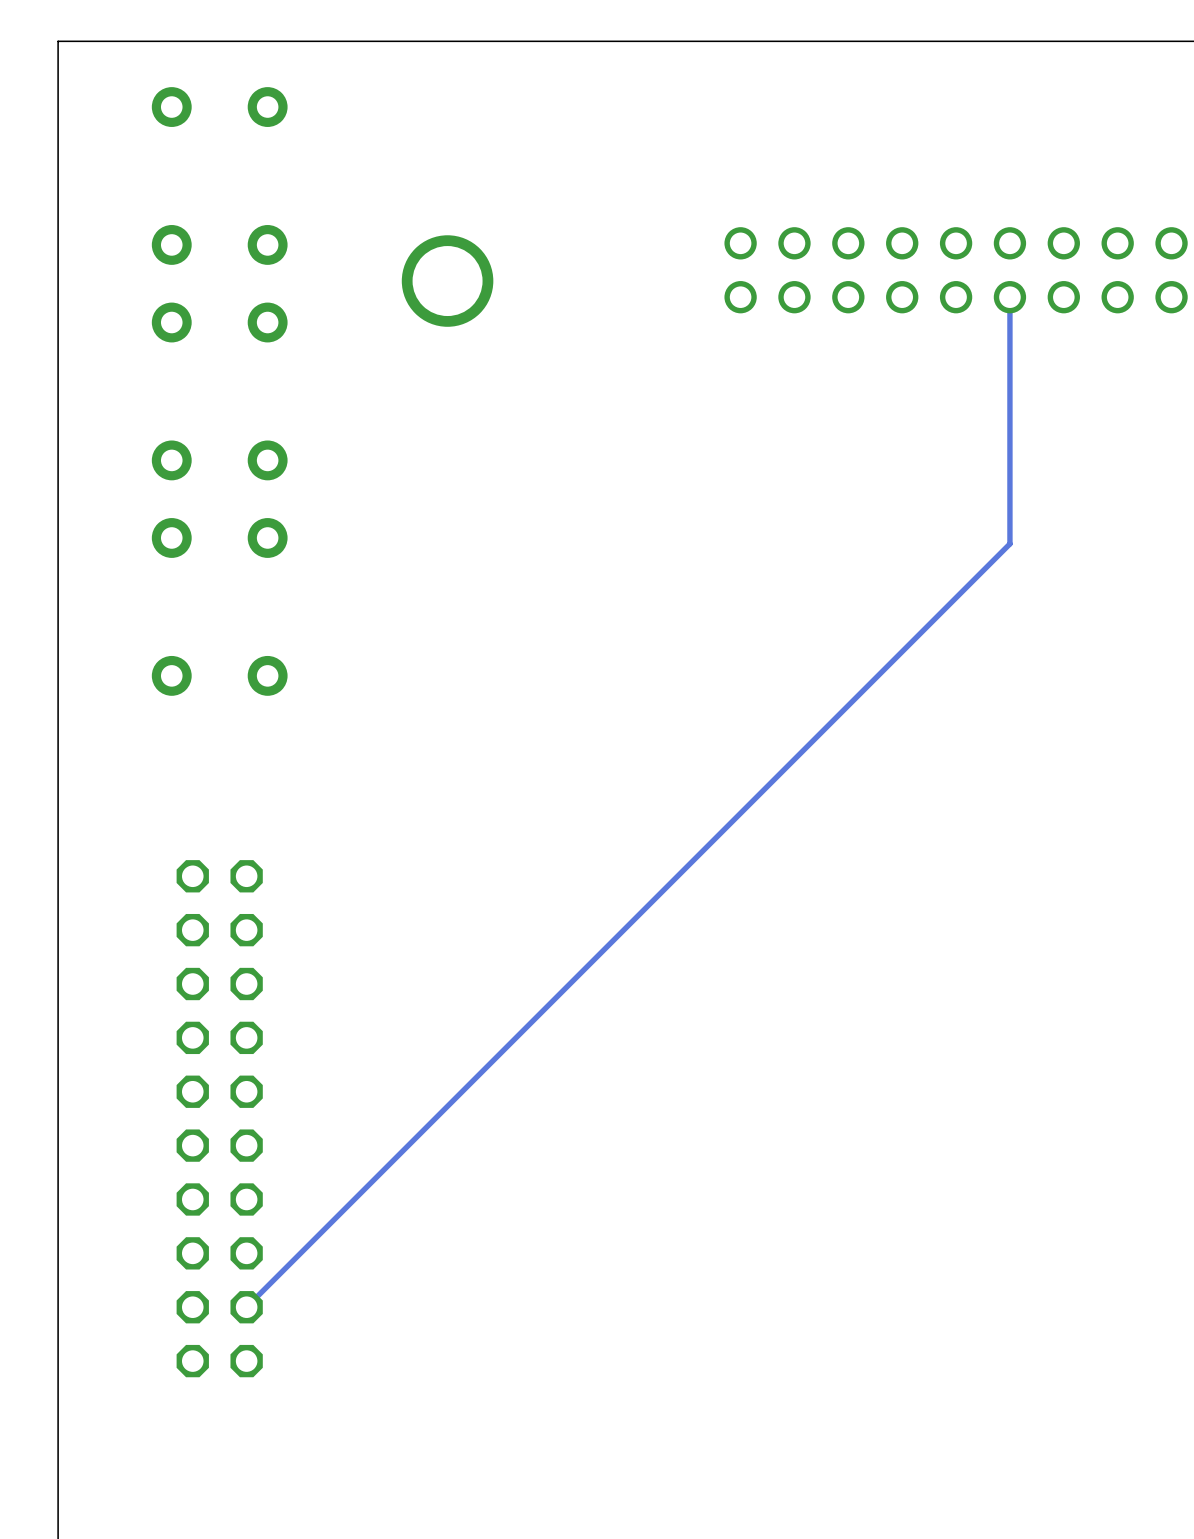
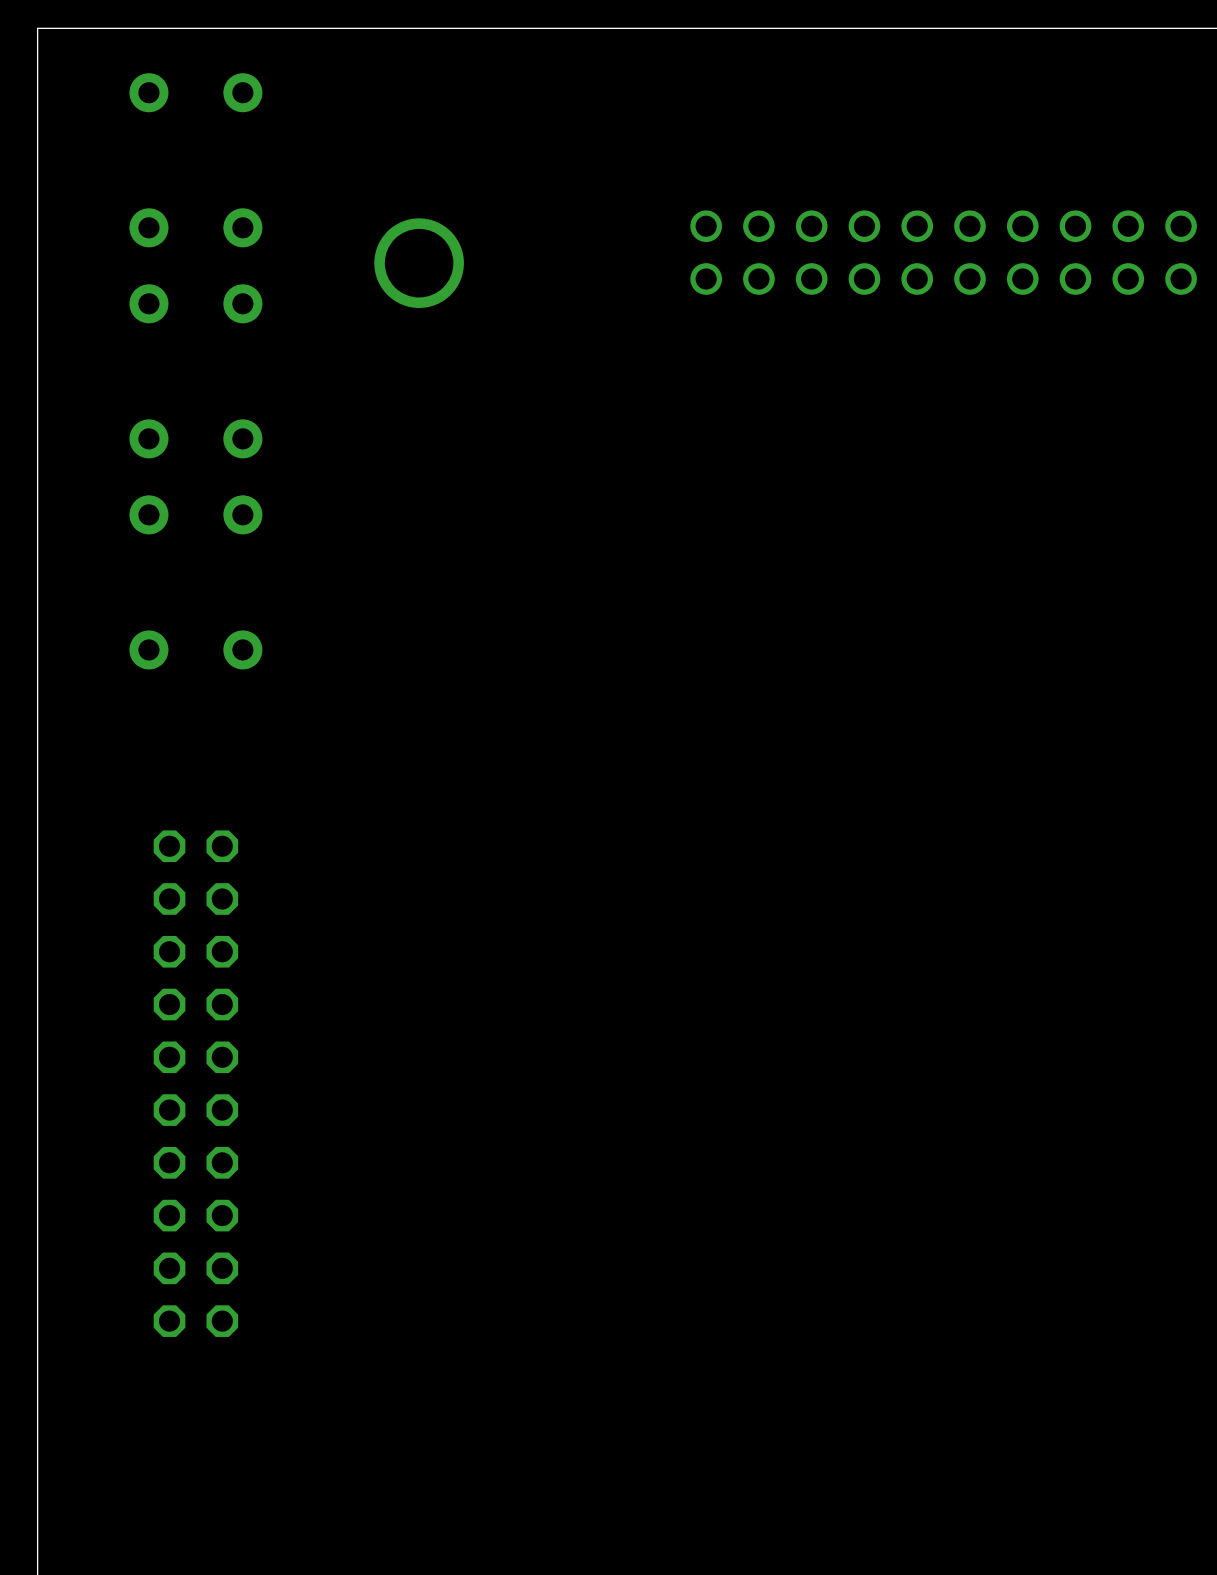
track: (1009, 297) (1009, 543) (246, 1307) -> none

